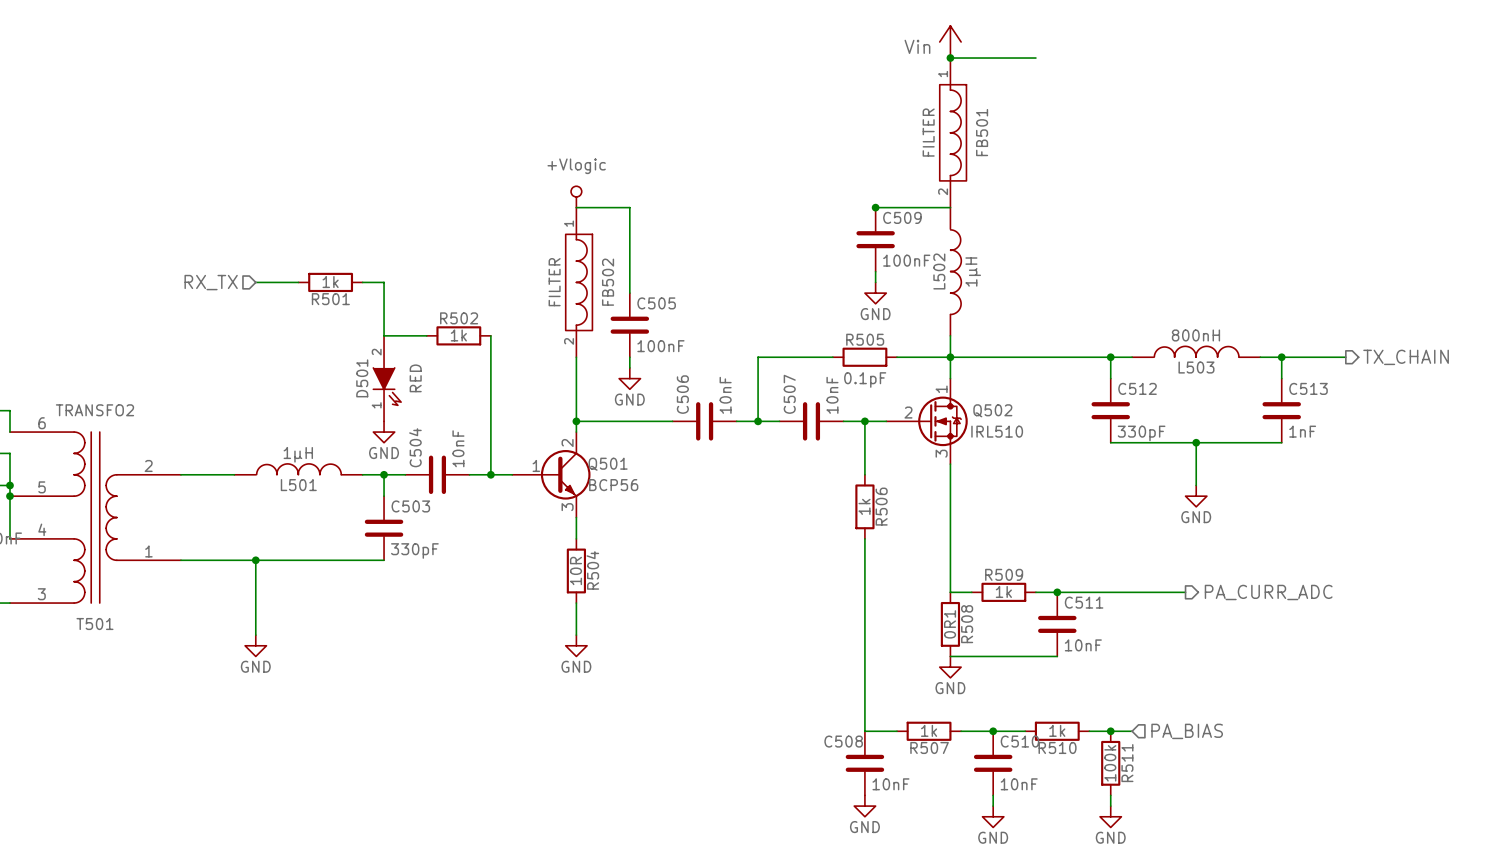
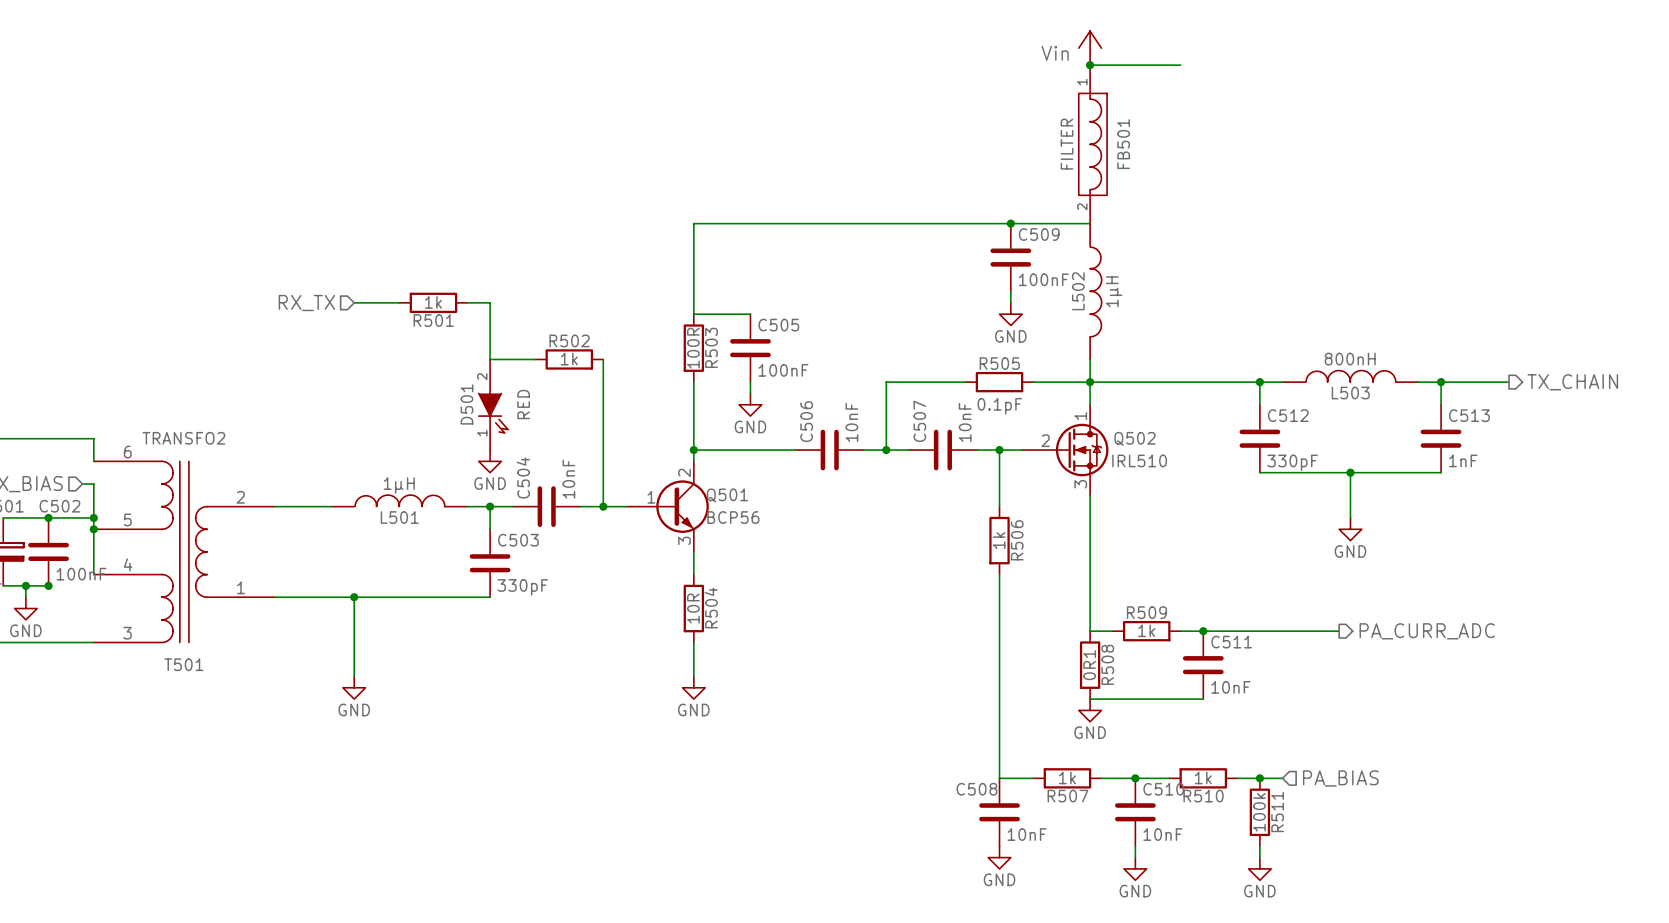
power symbol: +Vlogic (576, 196) -> none
wire: (629, 207) (629, 293) -> (693, 223) (693, 314) (750, 314)
wire: none -> (750, 223) (1010, 223)
FB502: FILTER (579, 282) -> none
R503: none -> 100R (693, 348)

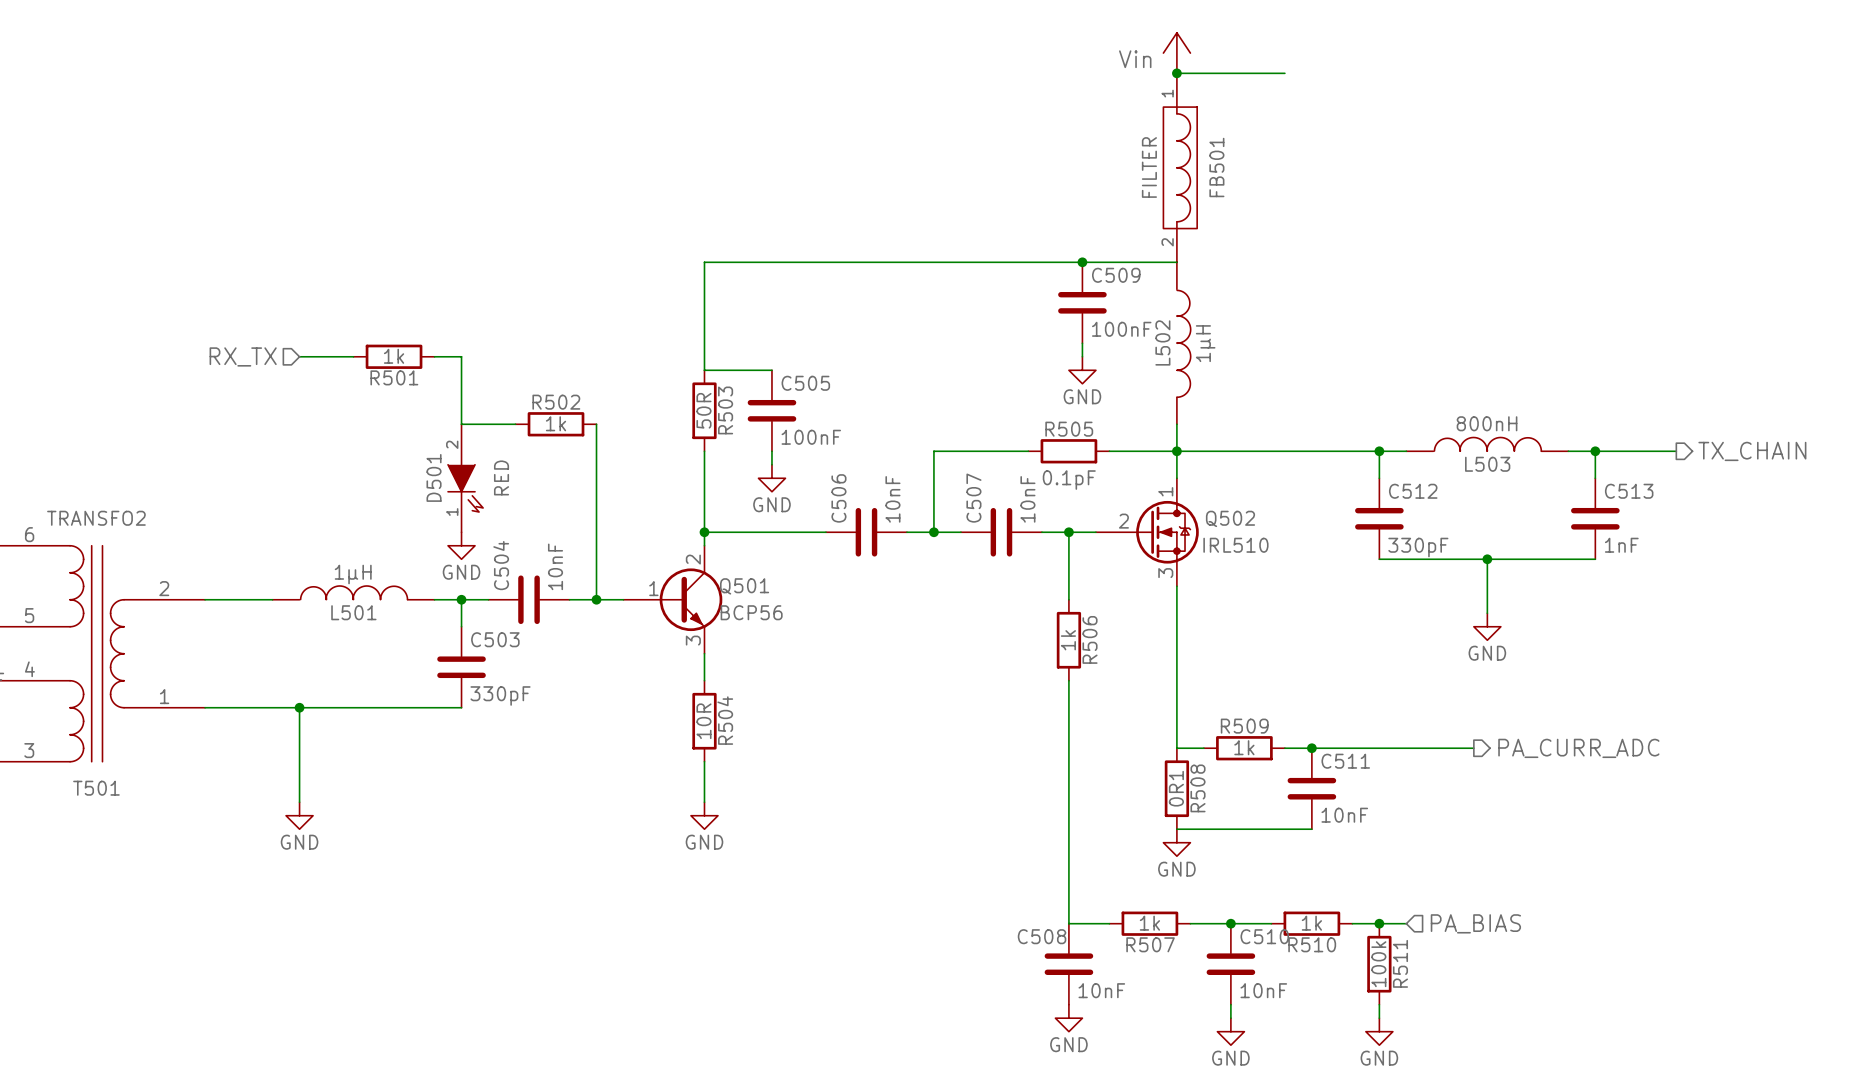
R503 value: 100R (693, 348) -> 50R (703, 410)

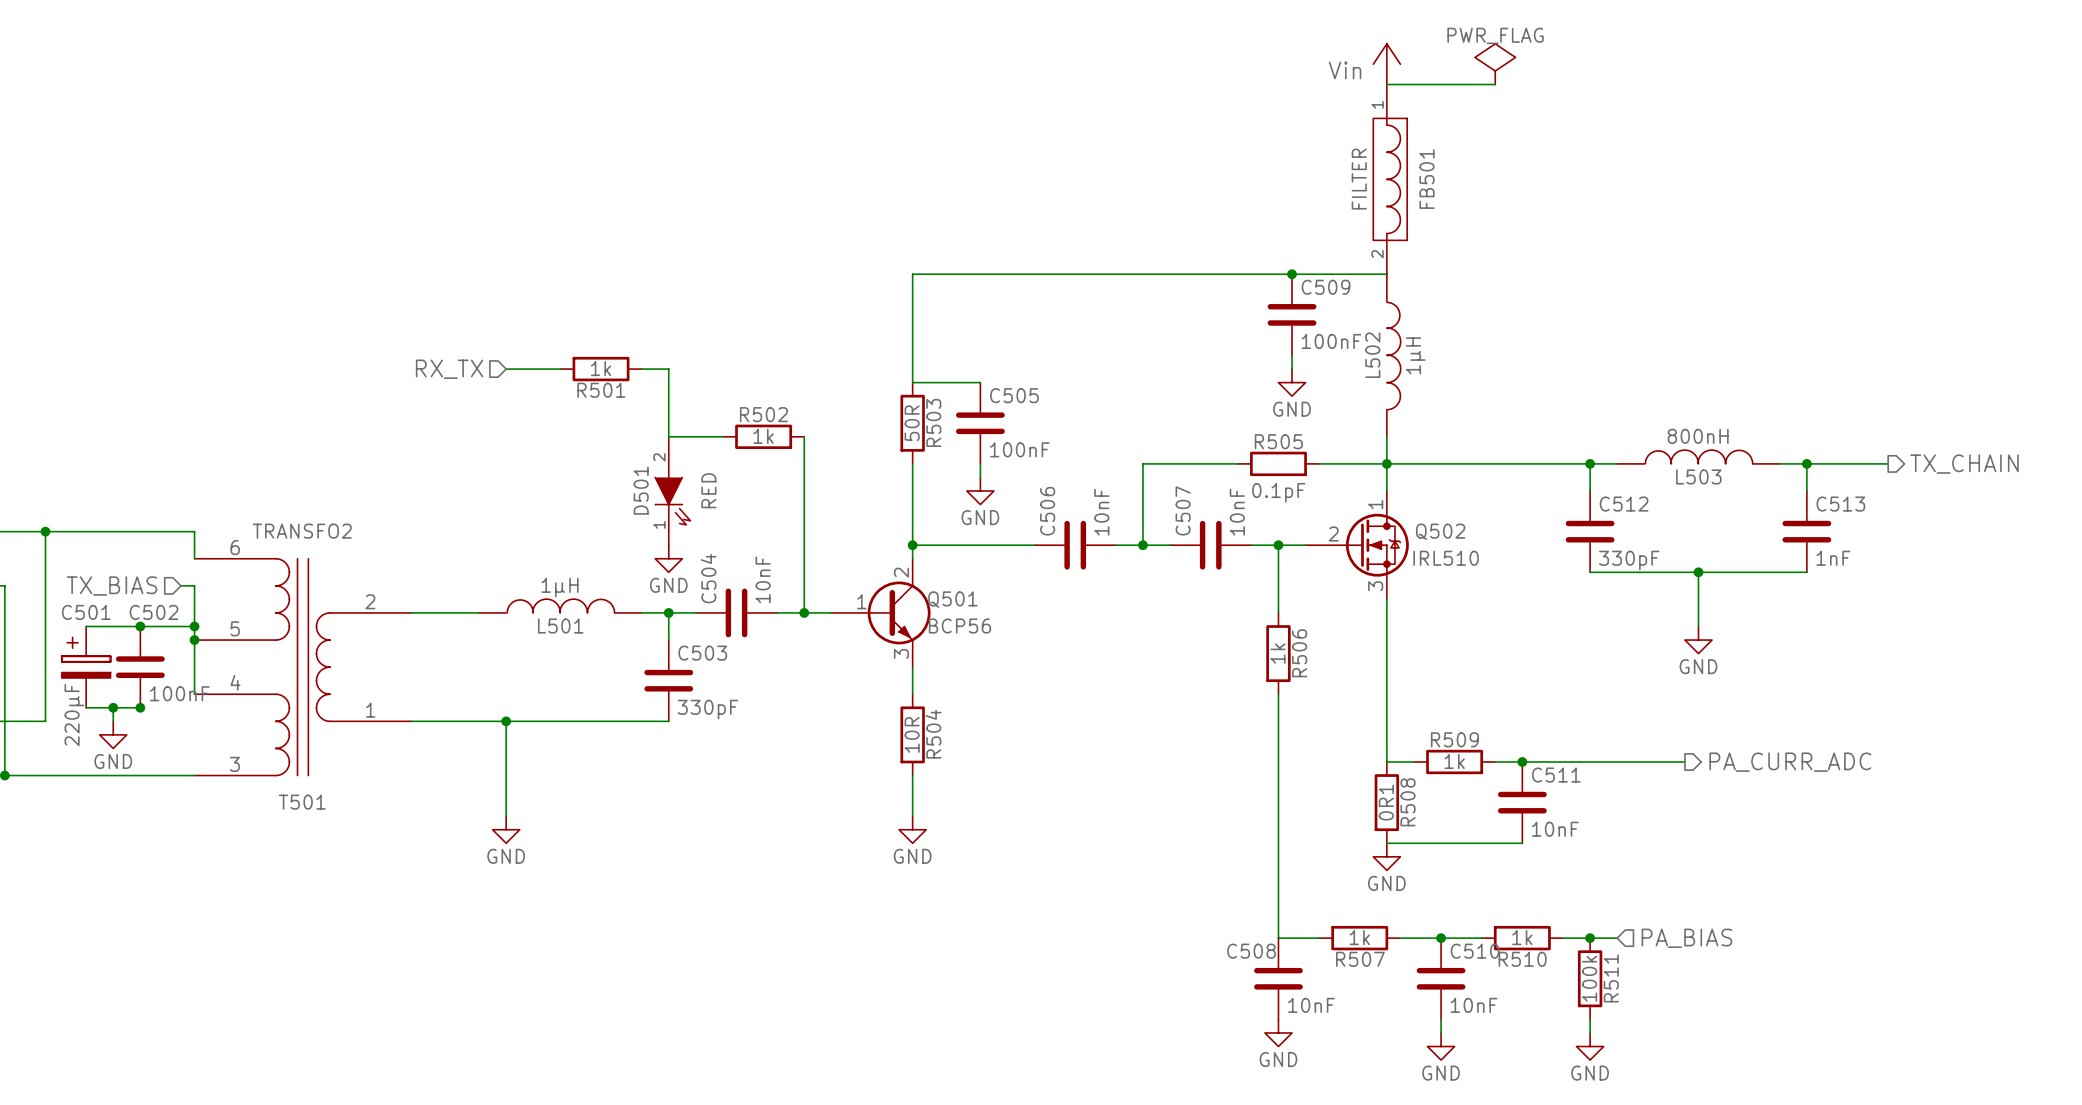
power symbol: none -> PWR_FLAG (1495, 64)
junction: (1176, 73) -> none

